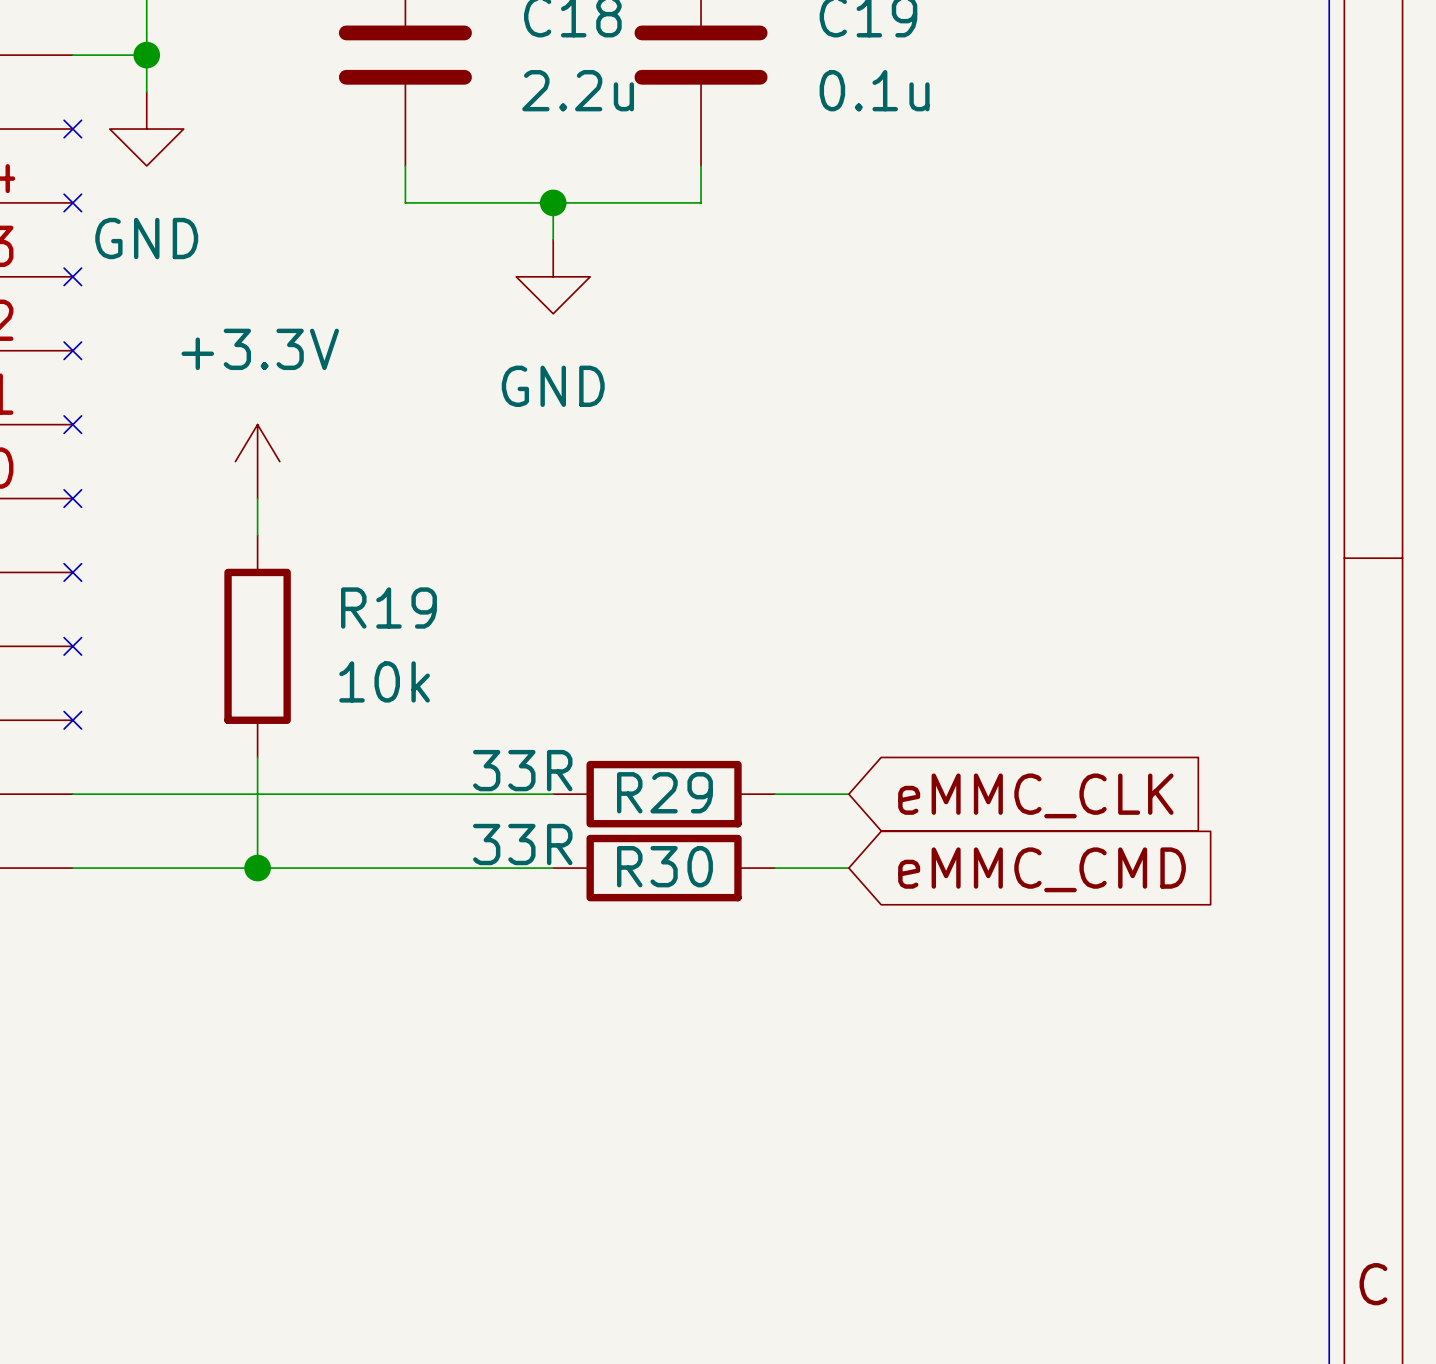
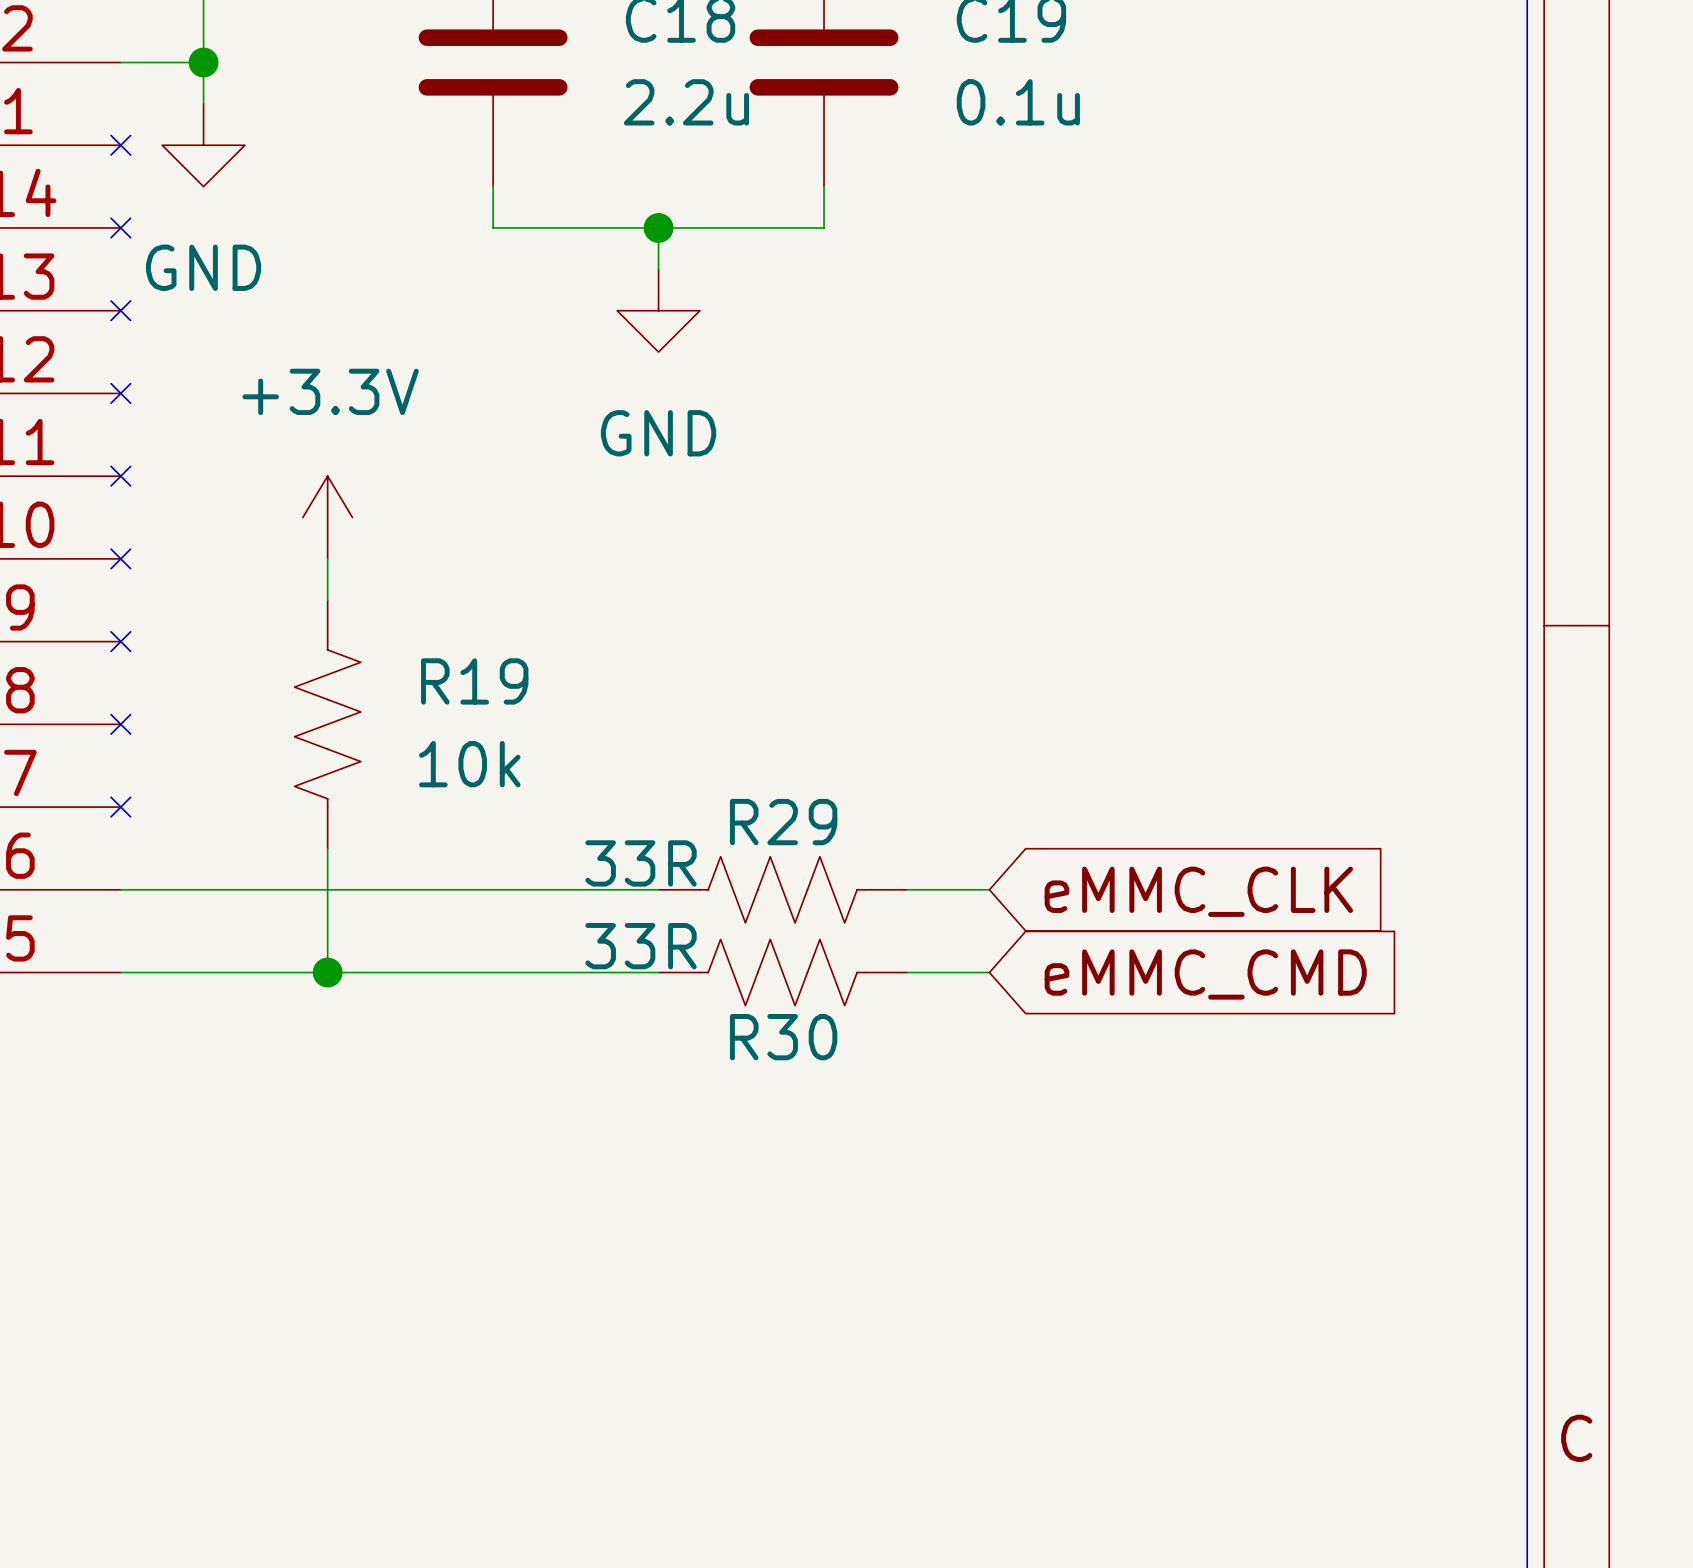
R19 symbol: [224, 535, 291, 758] -> [294, 600, 361, 849]
R29 symbol: [553, 760, 775, 828] -> [658, 856, 907, 923]
R29 name position: R29 (664, 792) -> R29 (783, 822)
R30 symbol: [553, 834, 775, 902] -> [658, 939, 907, 1006]
R30 name position: R30 (664, 866) -> R30 (783, 1037)

